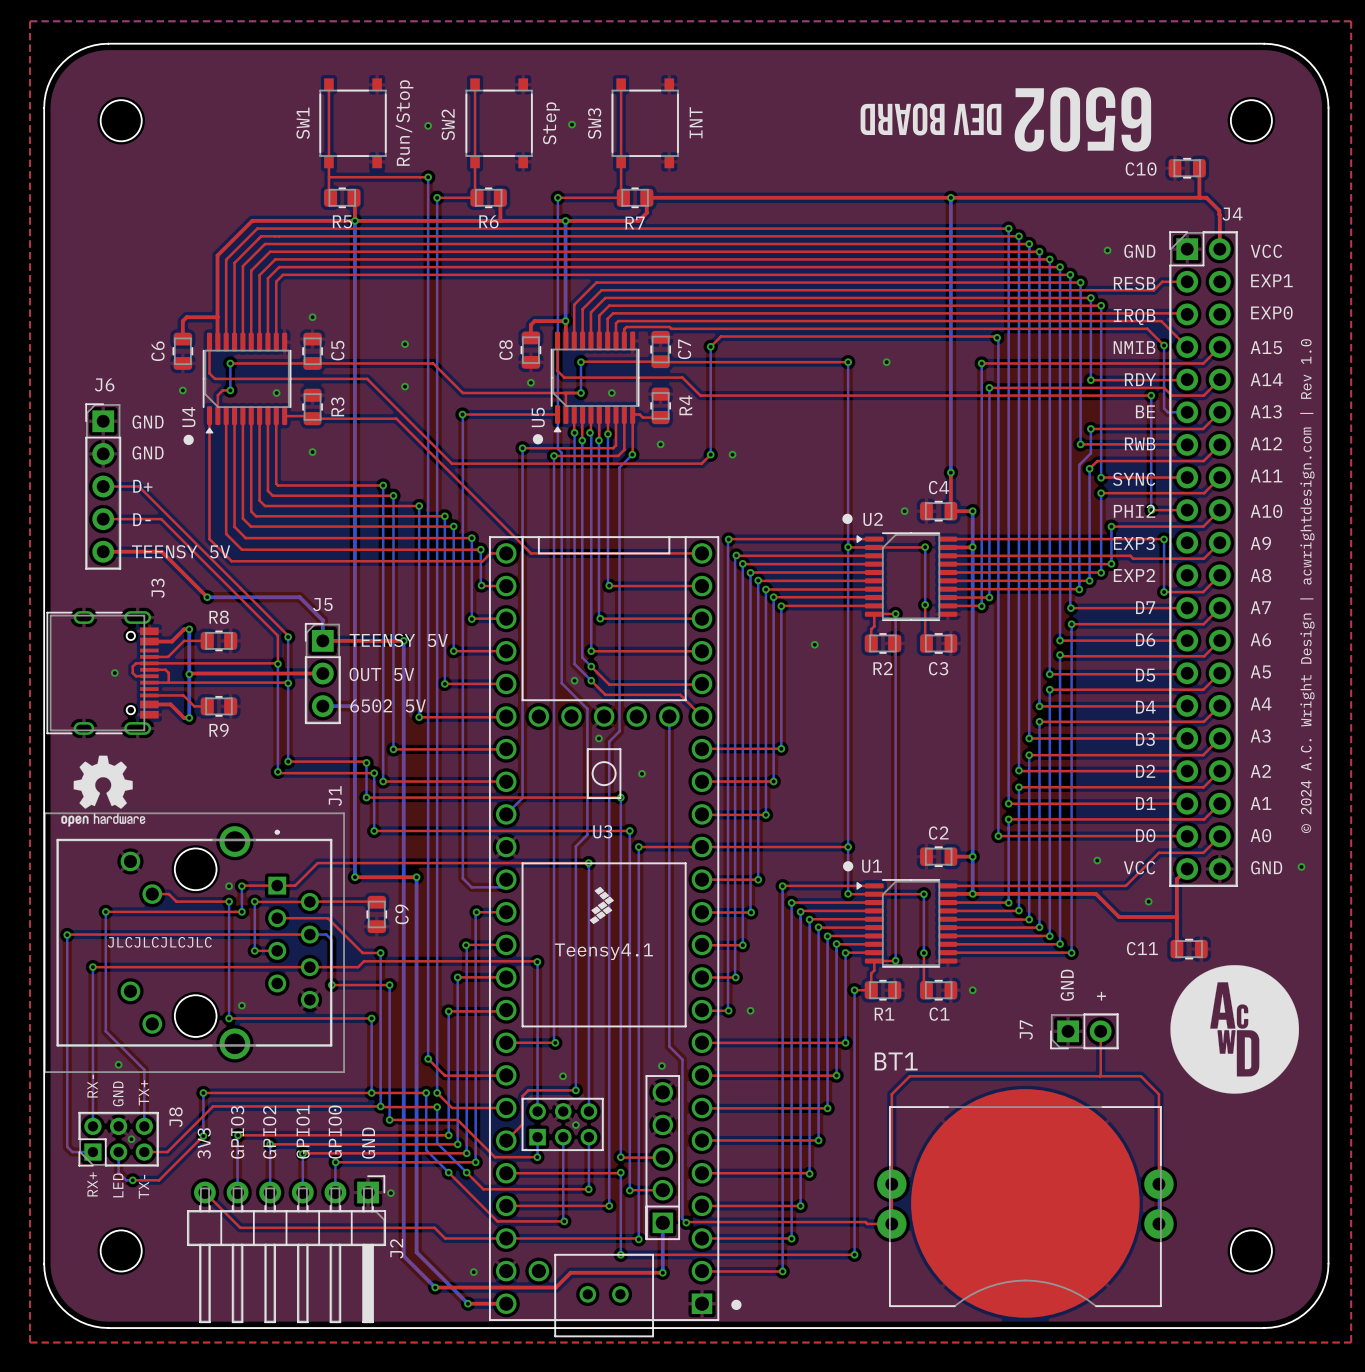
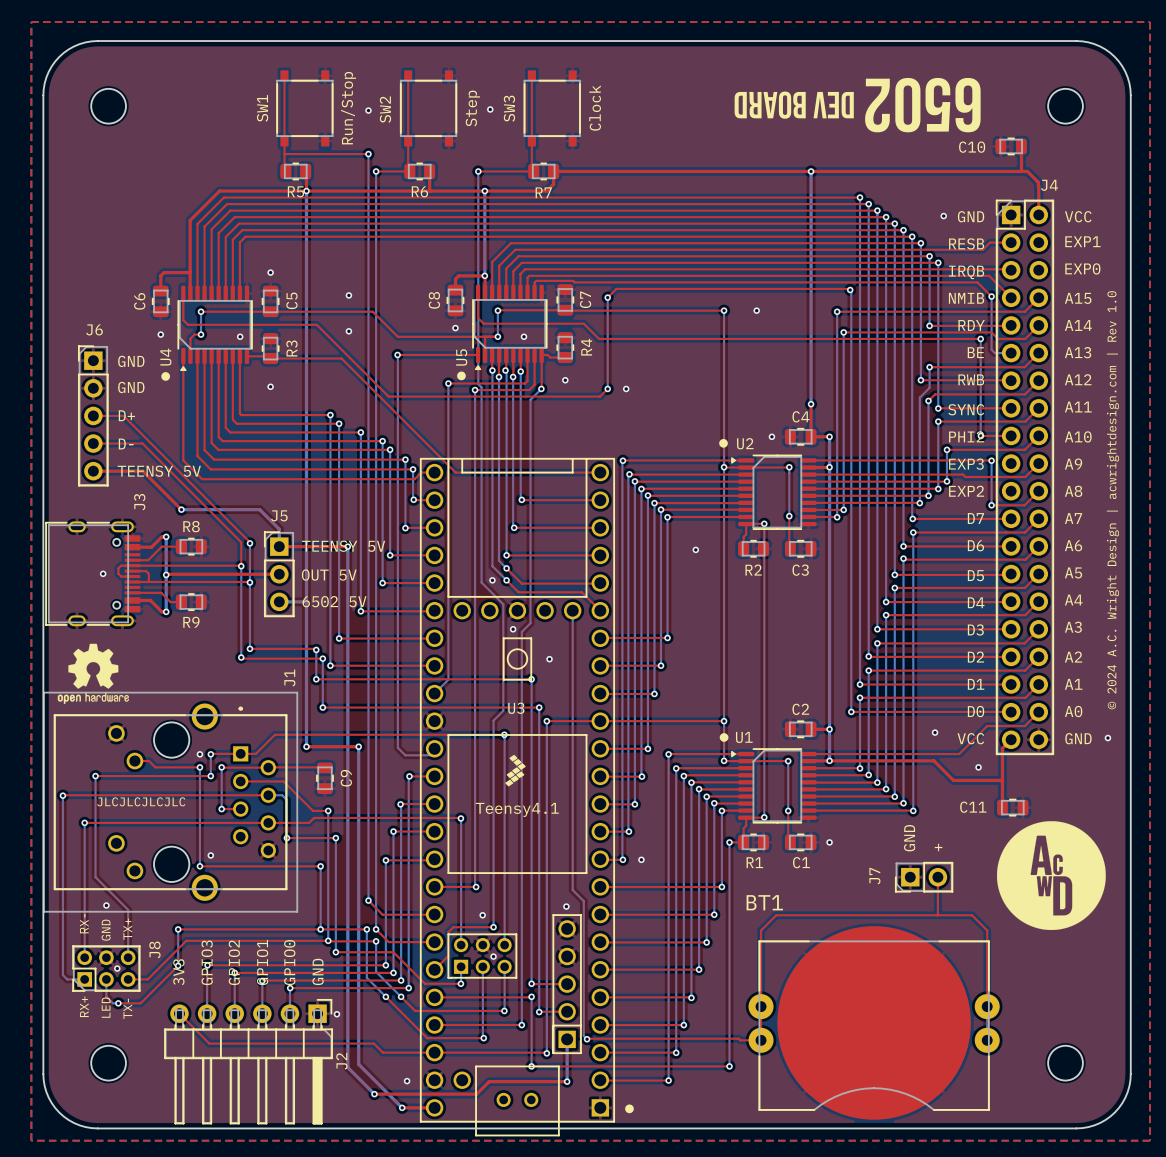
SW3 value: INT (696, 122) -> Clock (595, 108)

